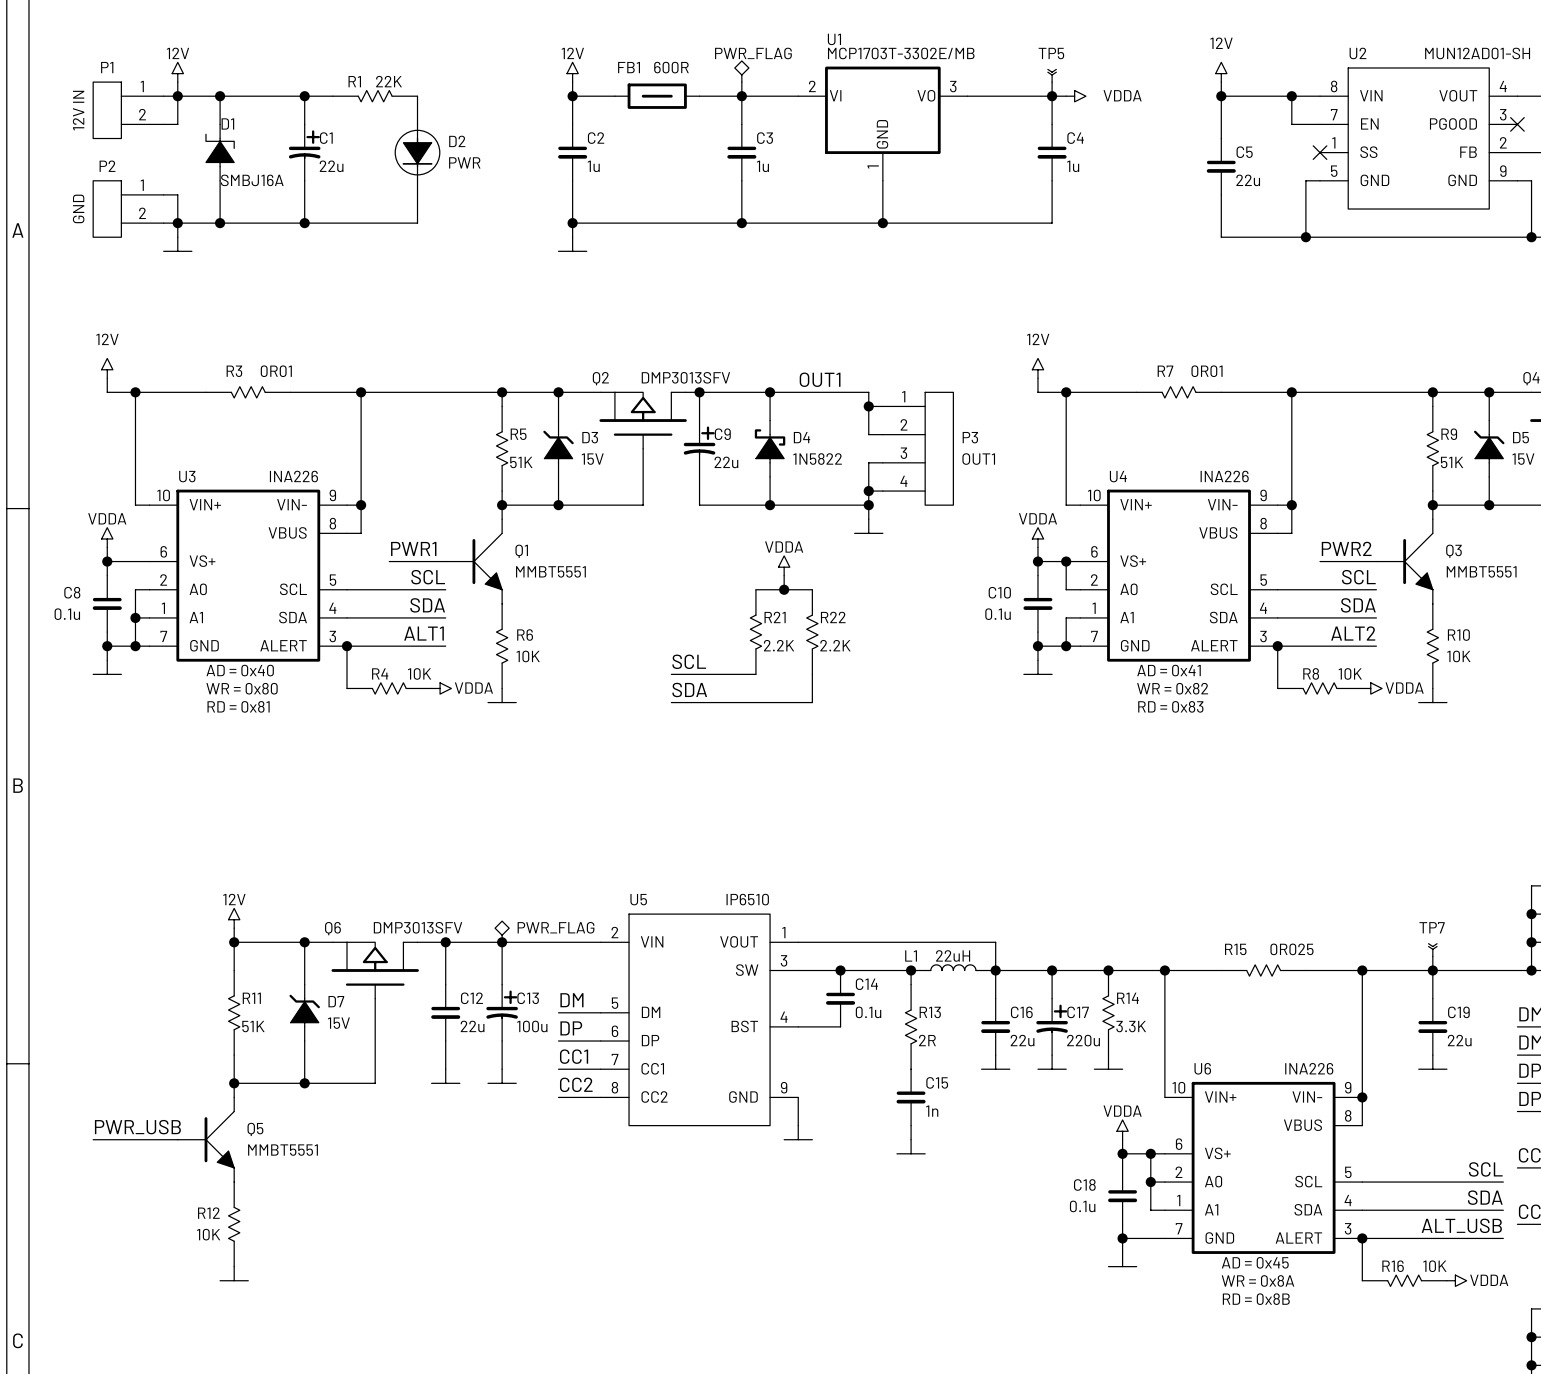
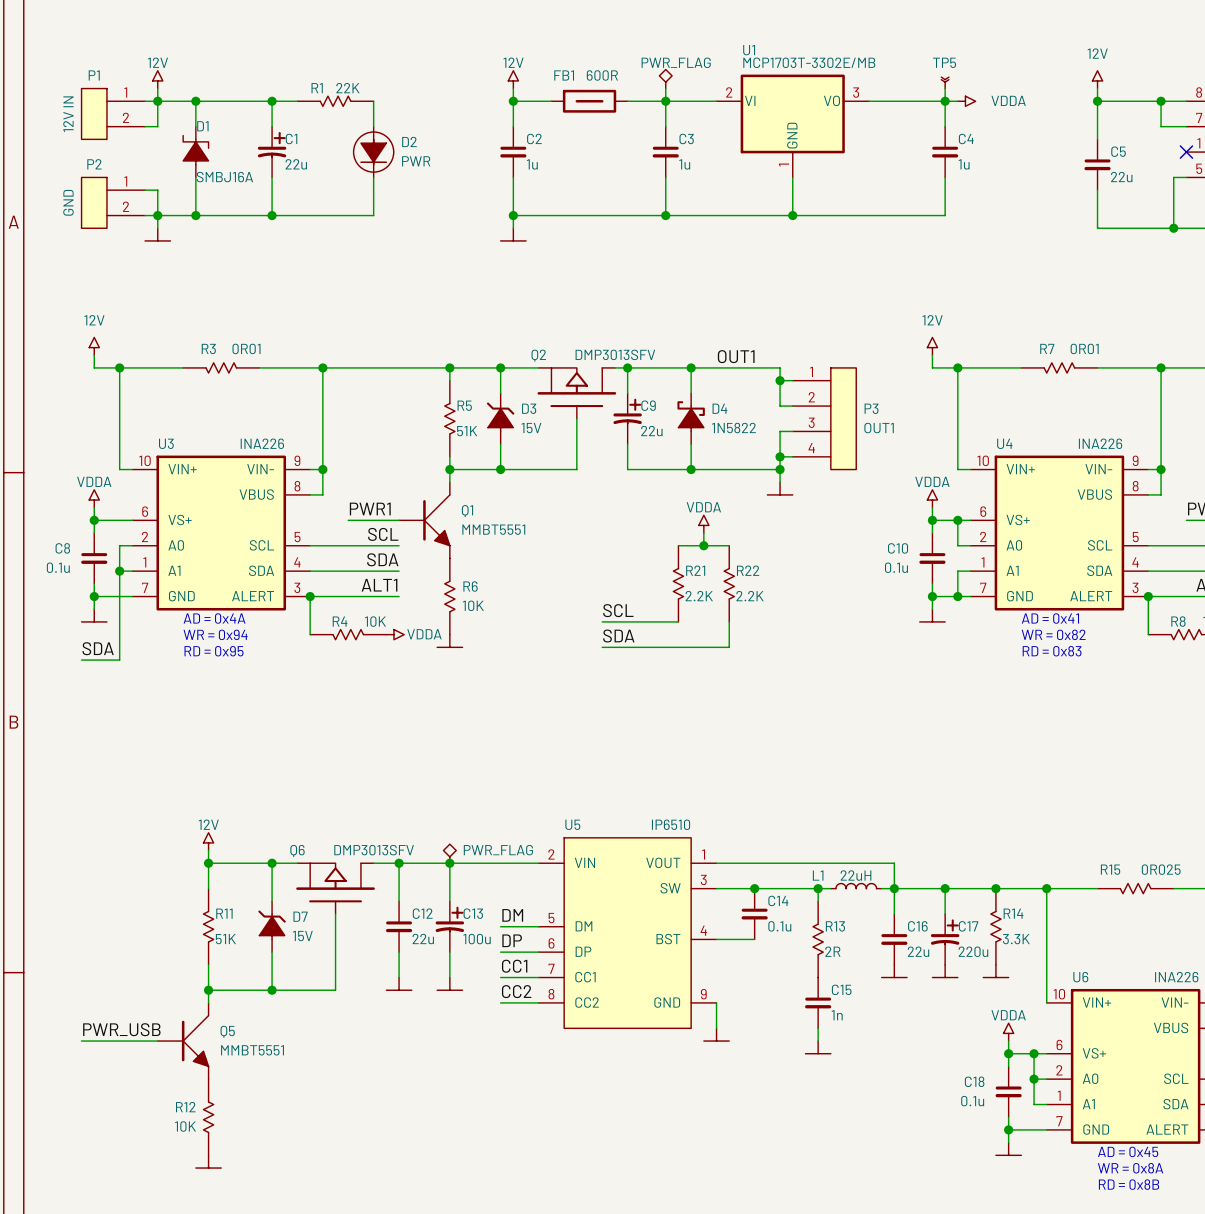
wire: none -> (119, 596) (119, 660) (81, 660)
junction: (135, 646) -> none
text: AD = 0x40 (240, 670) -> AD = 0x4A (214, 618)
text: WR = 0x80 (242, 688) -> WR = 0x94 (215, 634)
label: none -> SDA (98, 648)
text: RD = 0x81 (238, 706) -> RD = 0x95 (214, 651)

